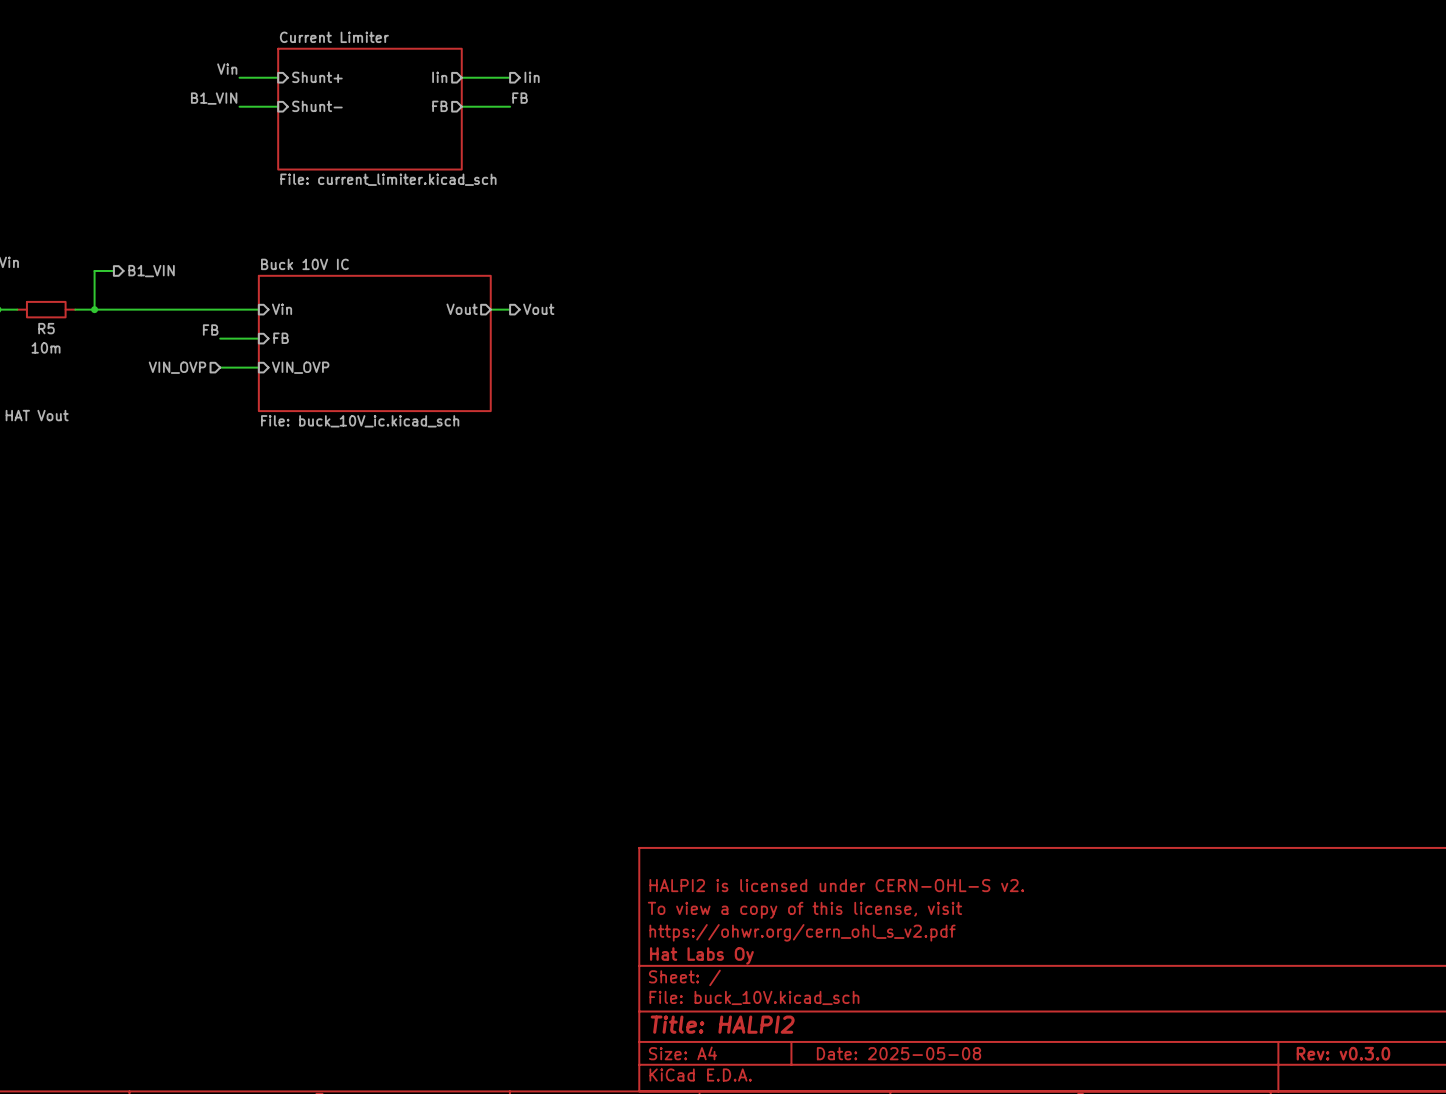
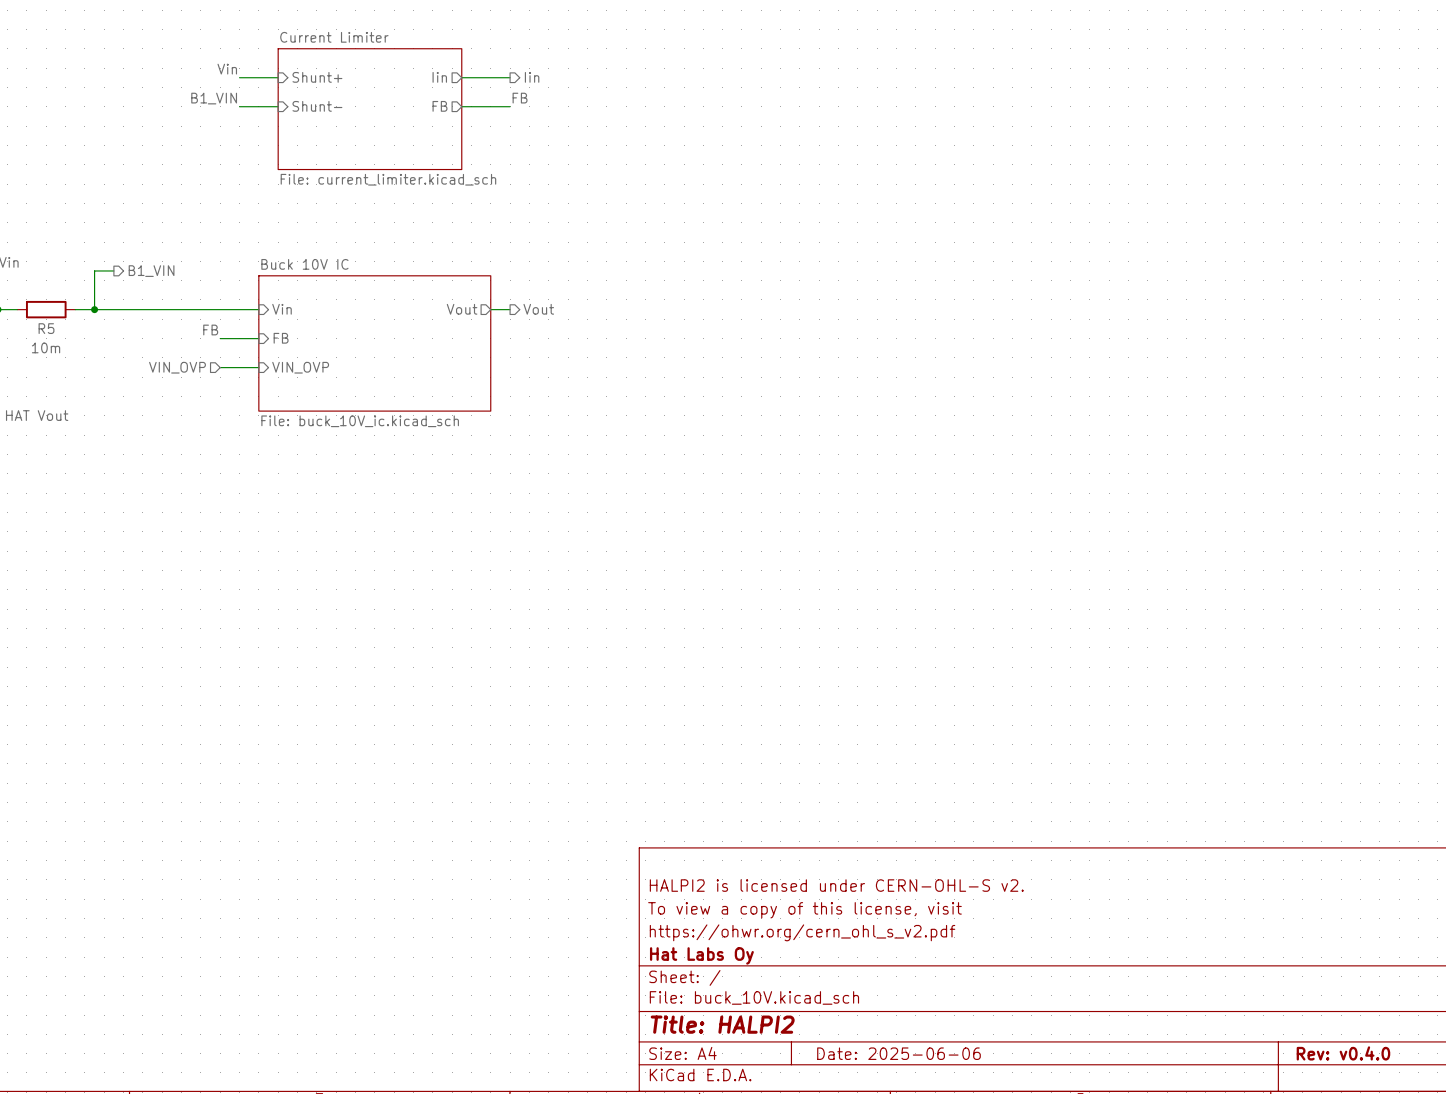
title block: Date: 2025-05-08 (898, 1053) -> Date: 2025-06-06 (898, 1053)
title block: Rev: v0.3.0 (1343, 1053) -> Rev: v0.4.0 (1343, 1053)

